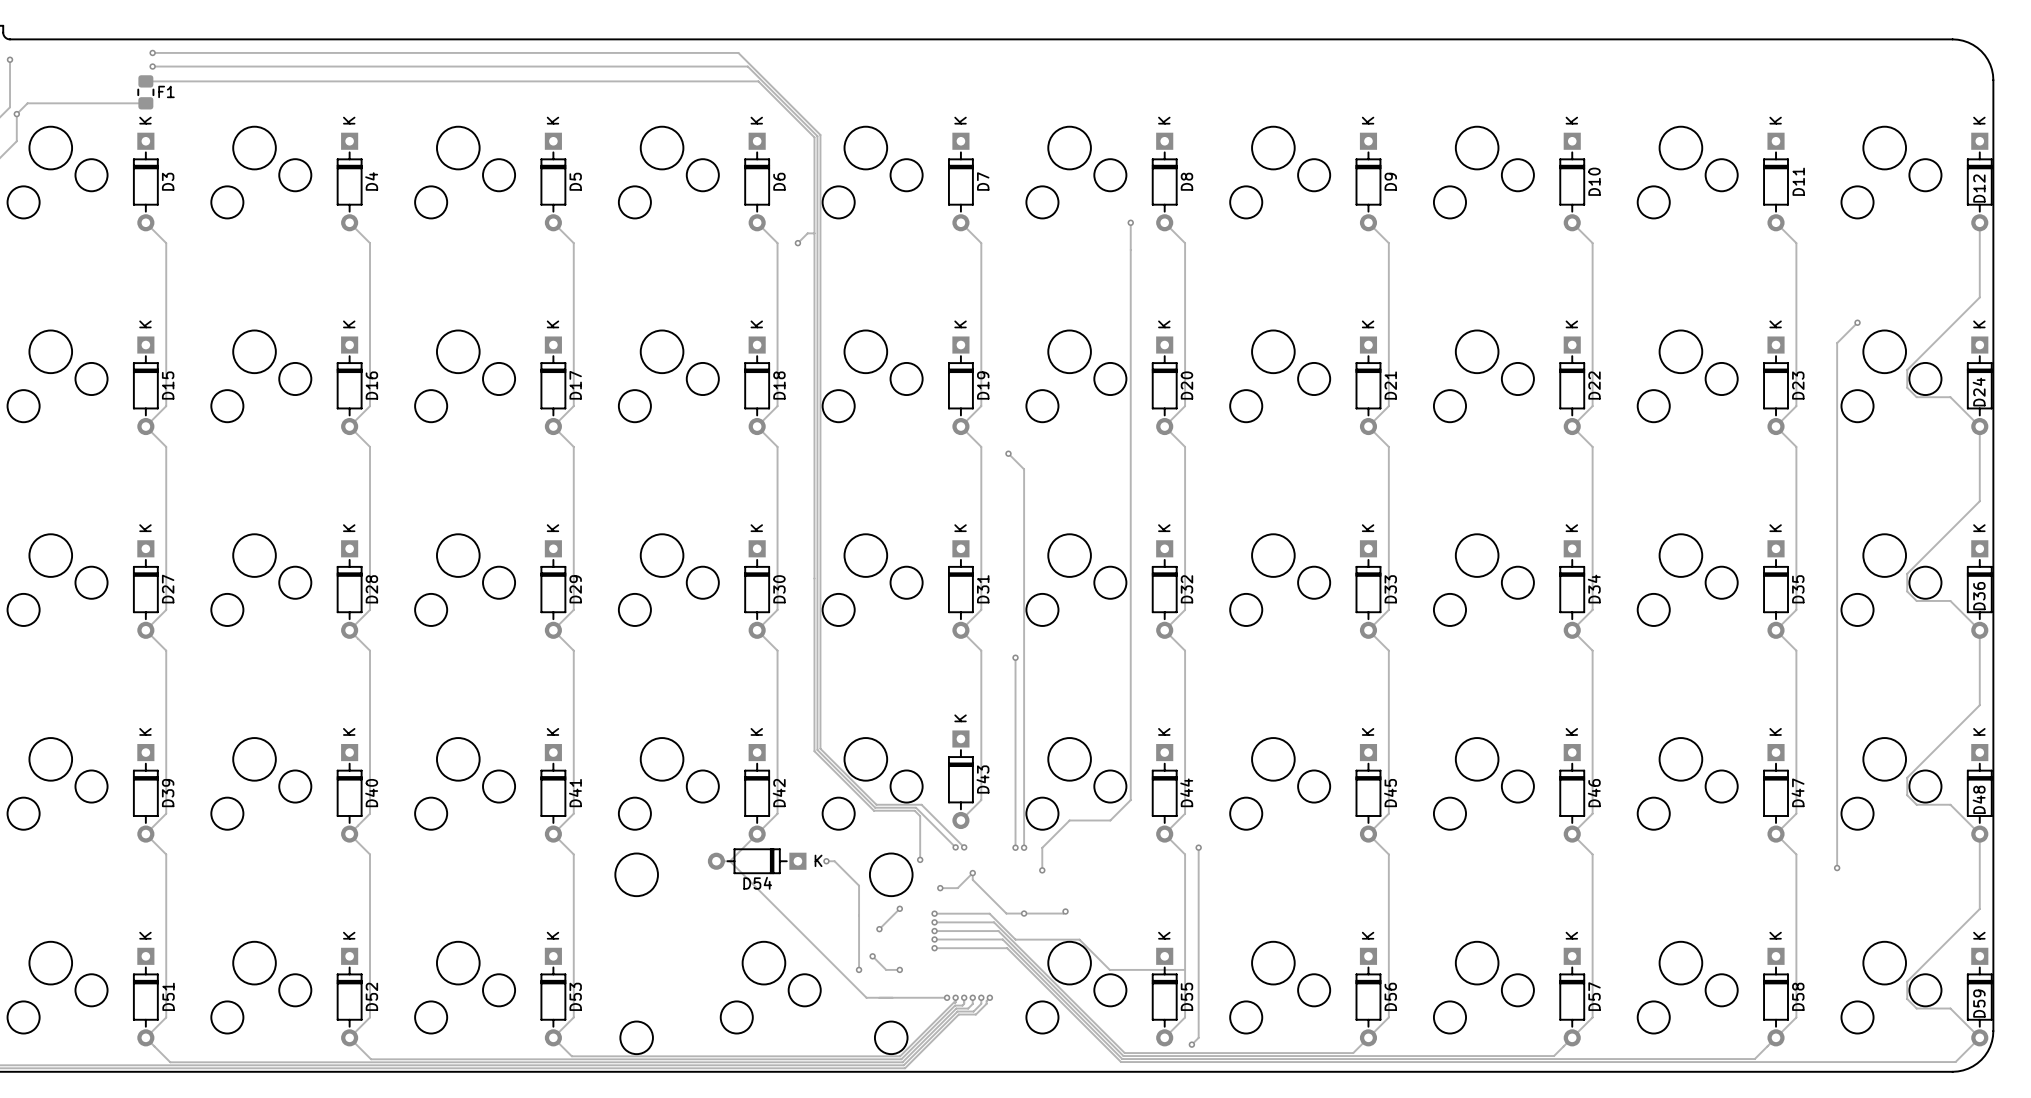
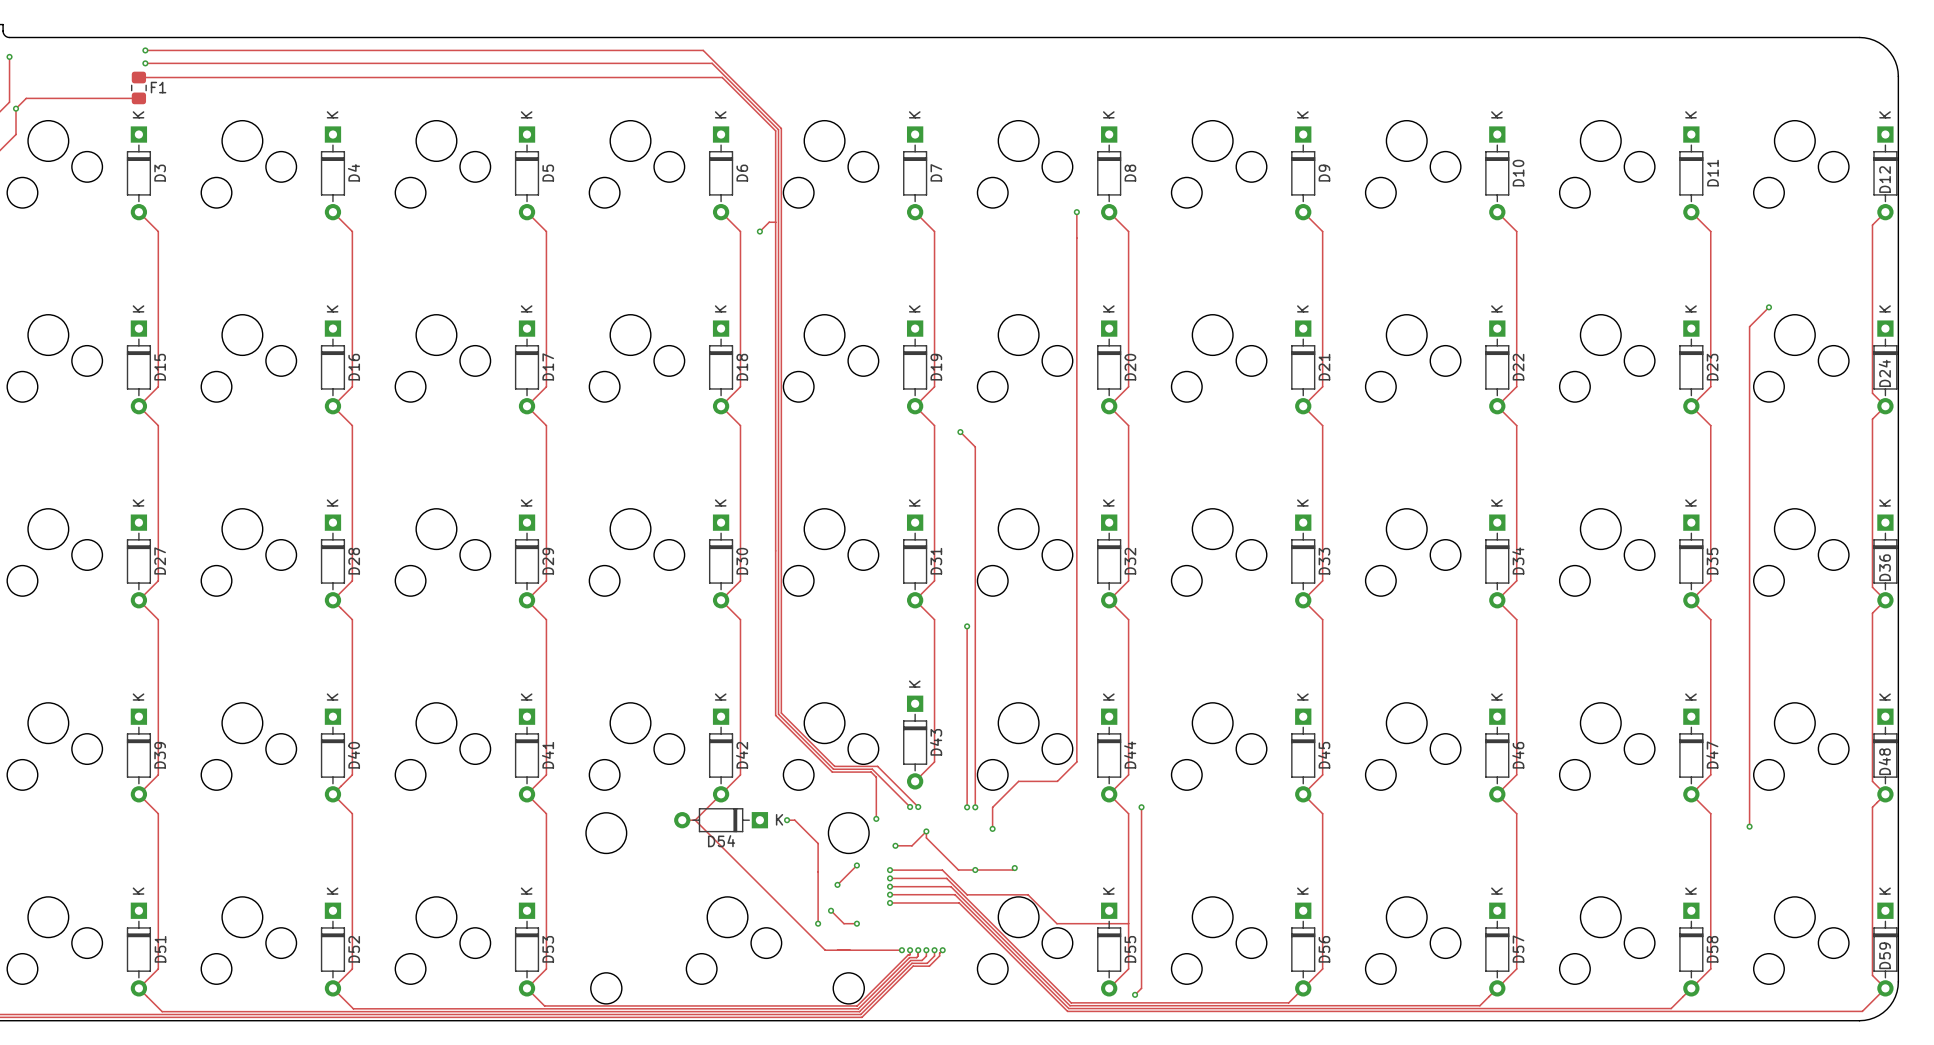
track: (1979, 222) (1979, 297) (1907, 370) (1907, 387) (1916, 397) (1950, 397) (1966, 412) -> (1885, 212) (1872, 225) (1872, 393)
track: (1979, 426) (1979, 501) (1907, 573) (1907, 591) (1916, 600) (1950, 600) (1966, 616) -> (1885, 406) (1872, 419) (1872, 587)
track: (1979, 630) (1979, 705) (1907, 777) (1907, 795) (1916, 804) (1950, 804) (1966, 820) -> (1885, 600) (1872, 613) (1872, 781)
track: (1979, 834) (1979, 908) (1907, 981) (1907, 999) (1916, 1008) (1950, 1008) (1966, 1024) -> (1885, 794) (1872, 807) (1872, 975)

